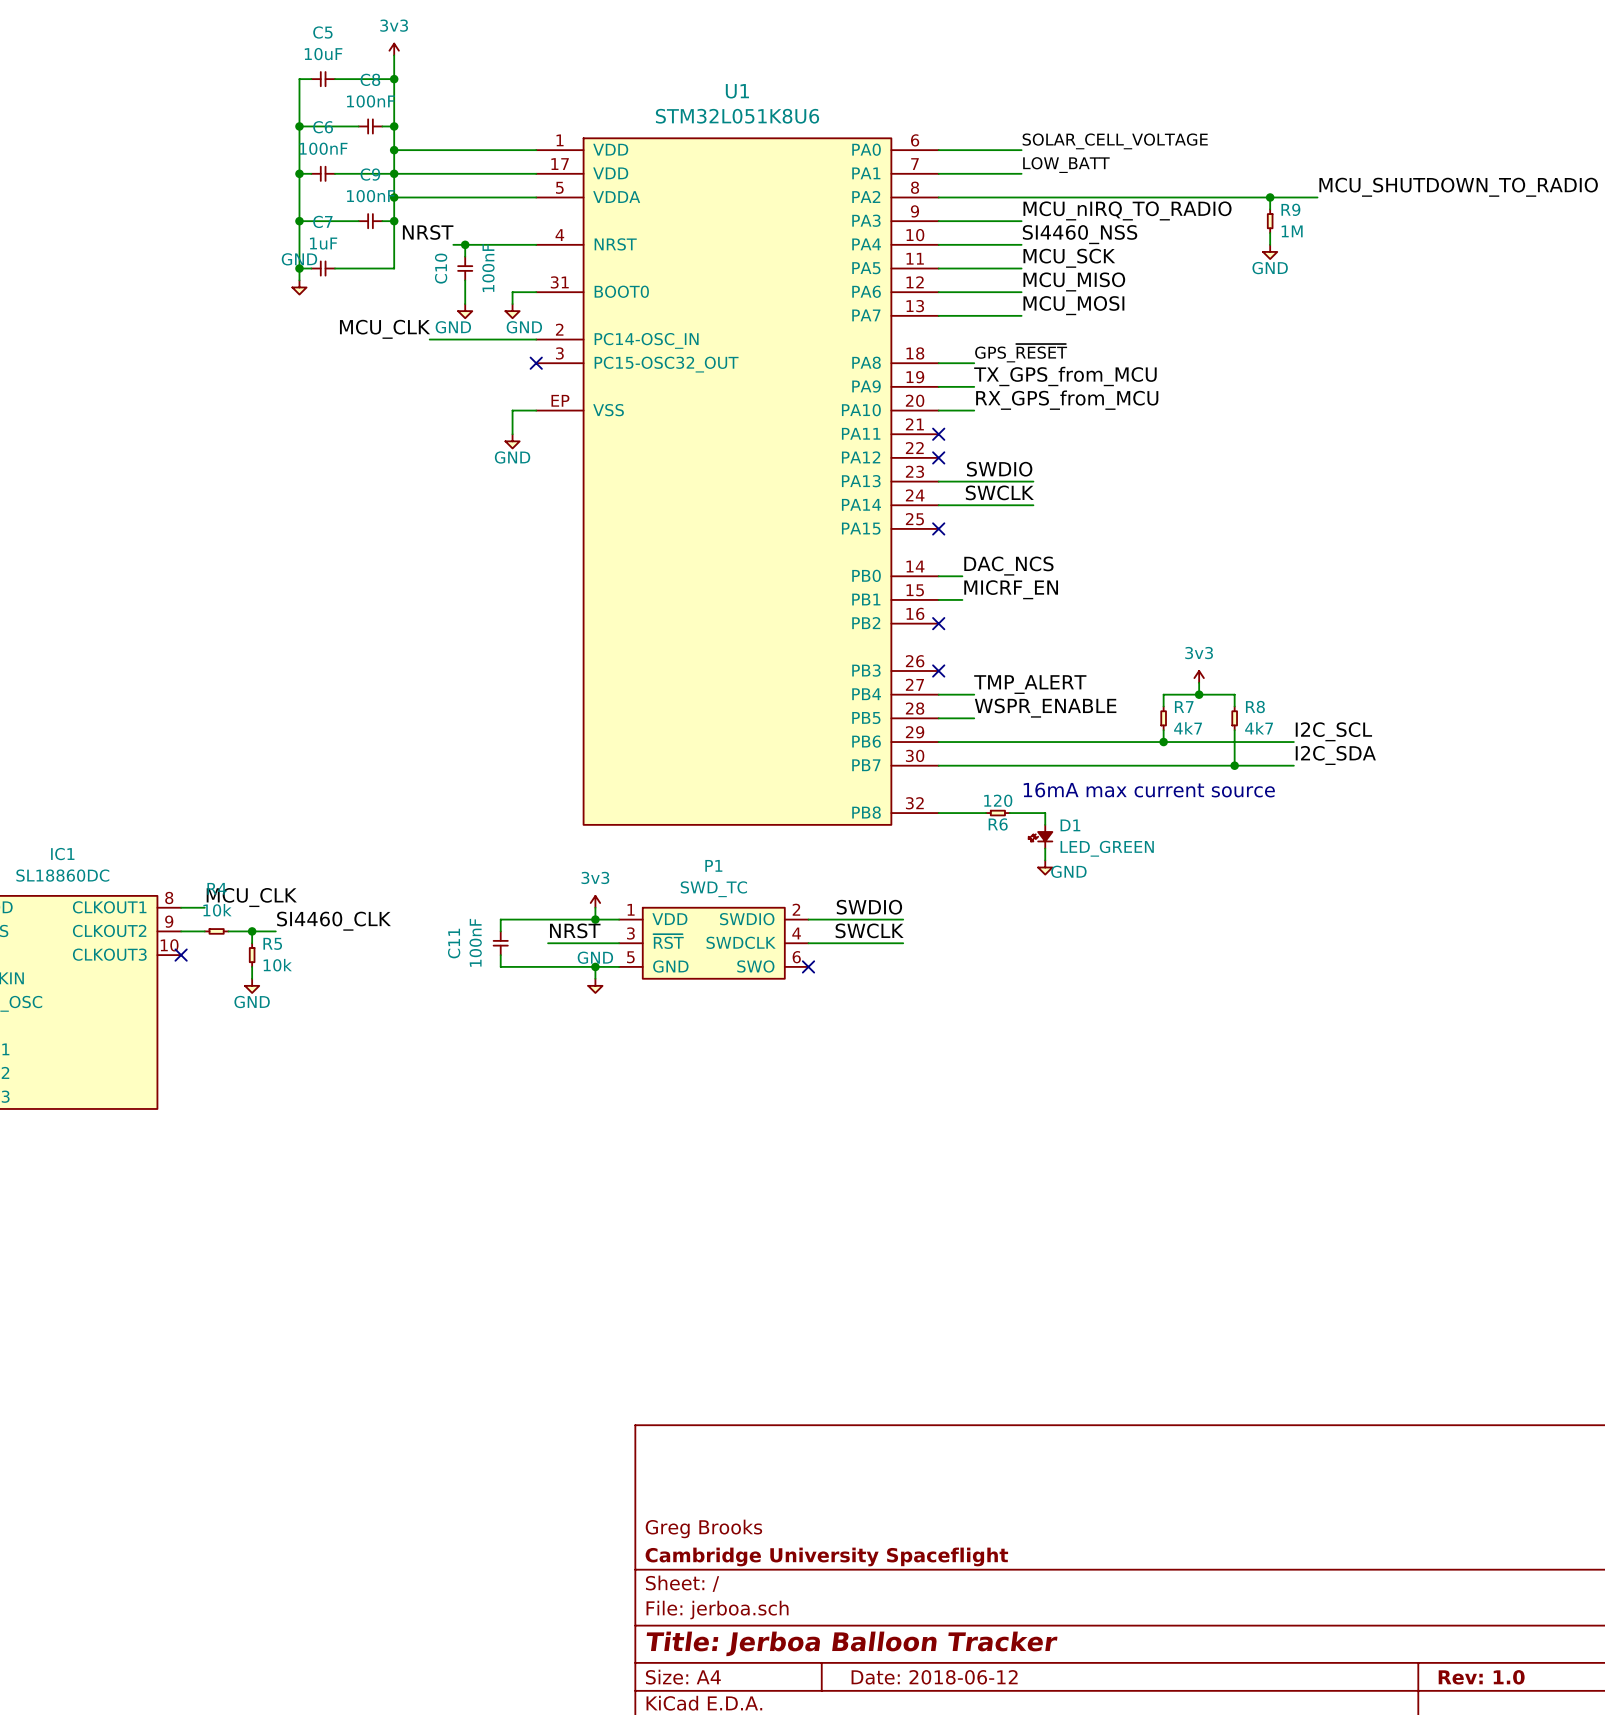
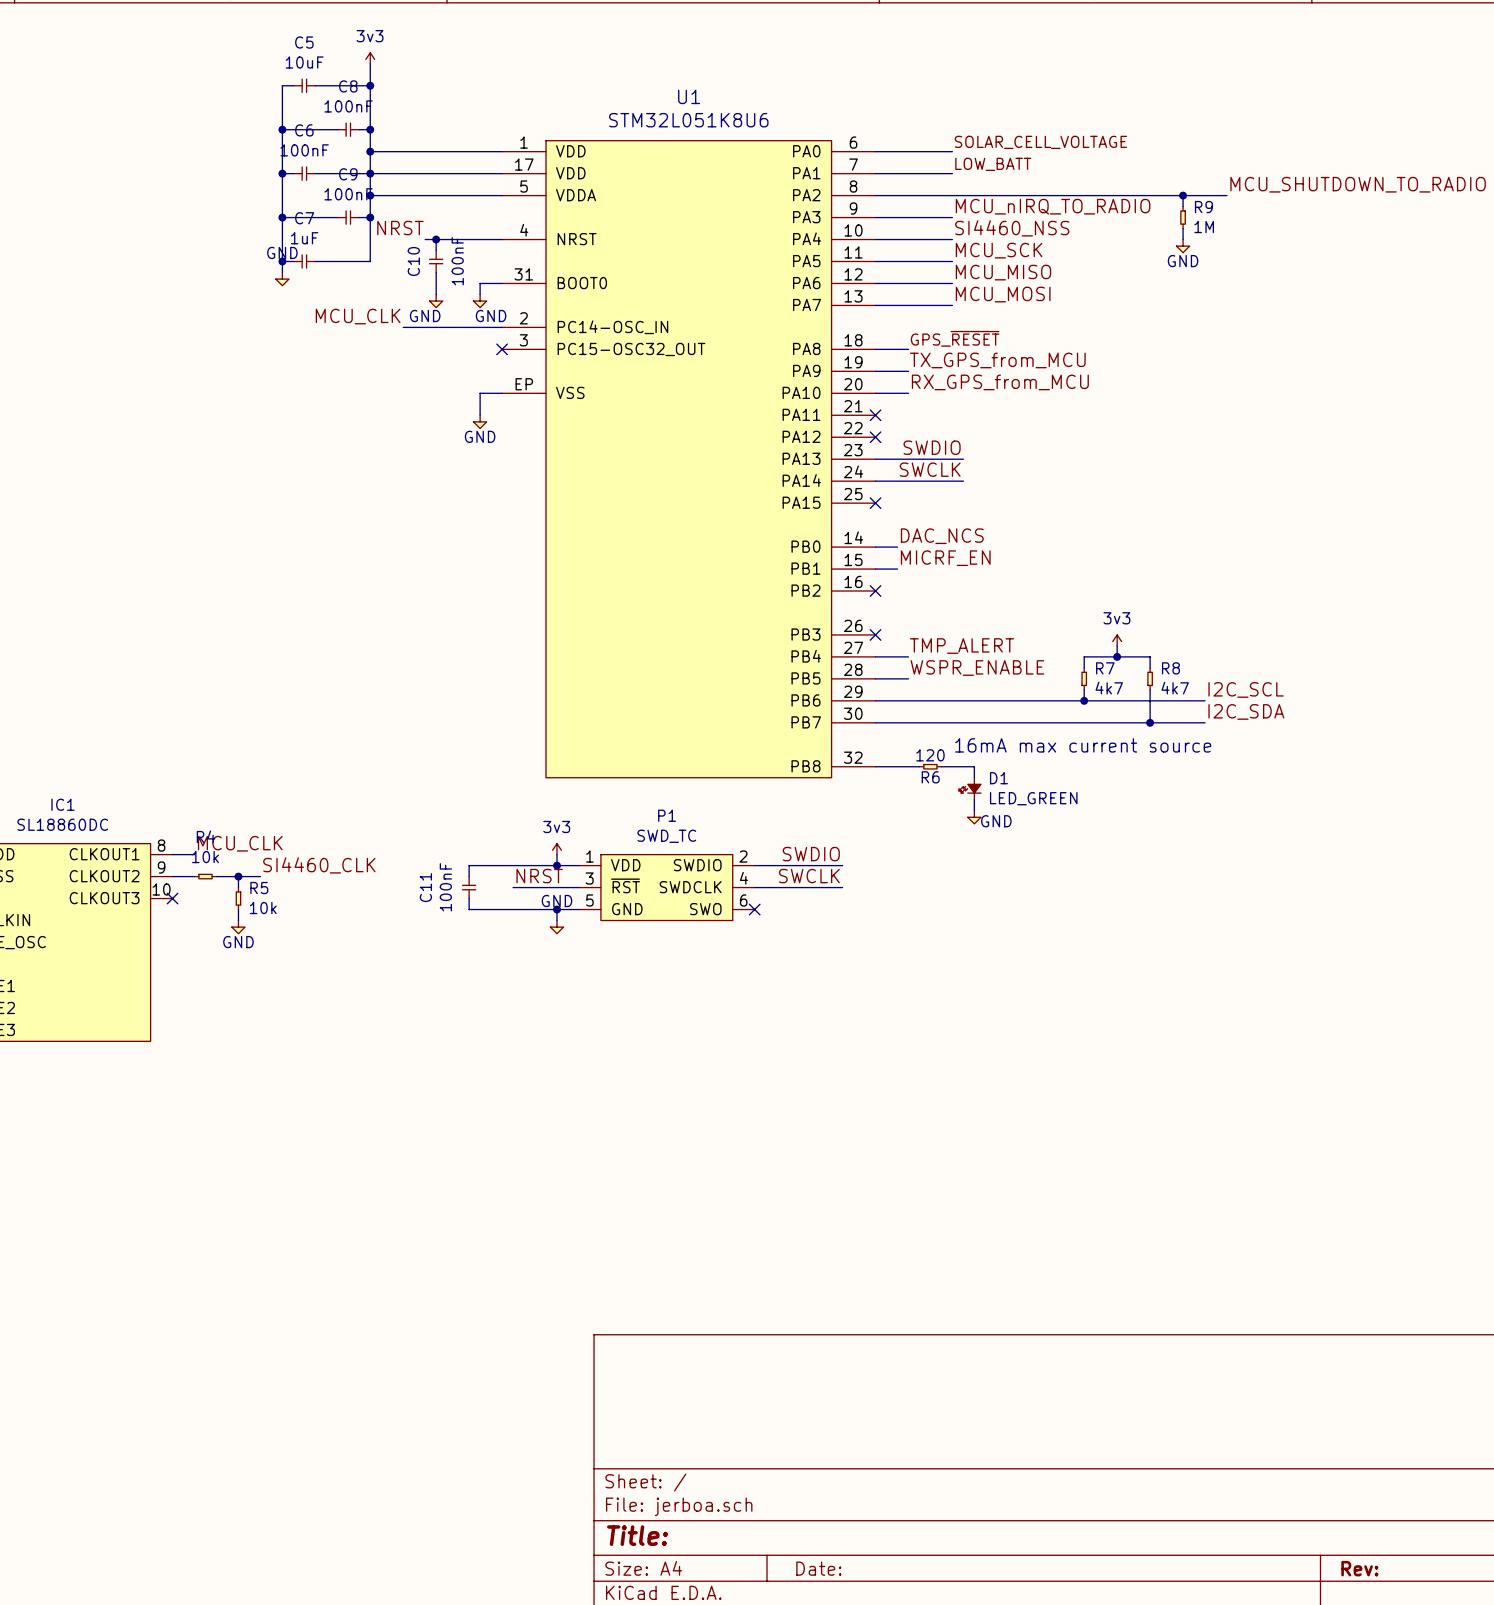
title block: Greg Brooks (703, 1528) -> none
title block: Cambridge University Spaceflight (826, 1556) -> none
title block: Title: Jerboa Balloon Tracker (852, 1643) -> Title: (637, 1535)
title block: Date: 2018-06-12 (934, 1677) -> Date: (818, 1568)
title block: Rev: 1.0 (1481, 1677) -> Rev: (1359, 1568)

